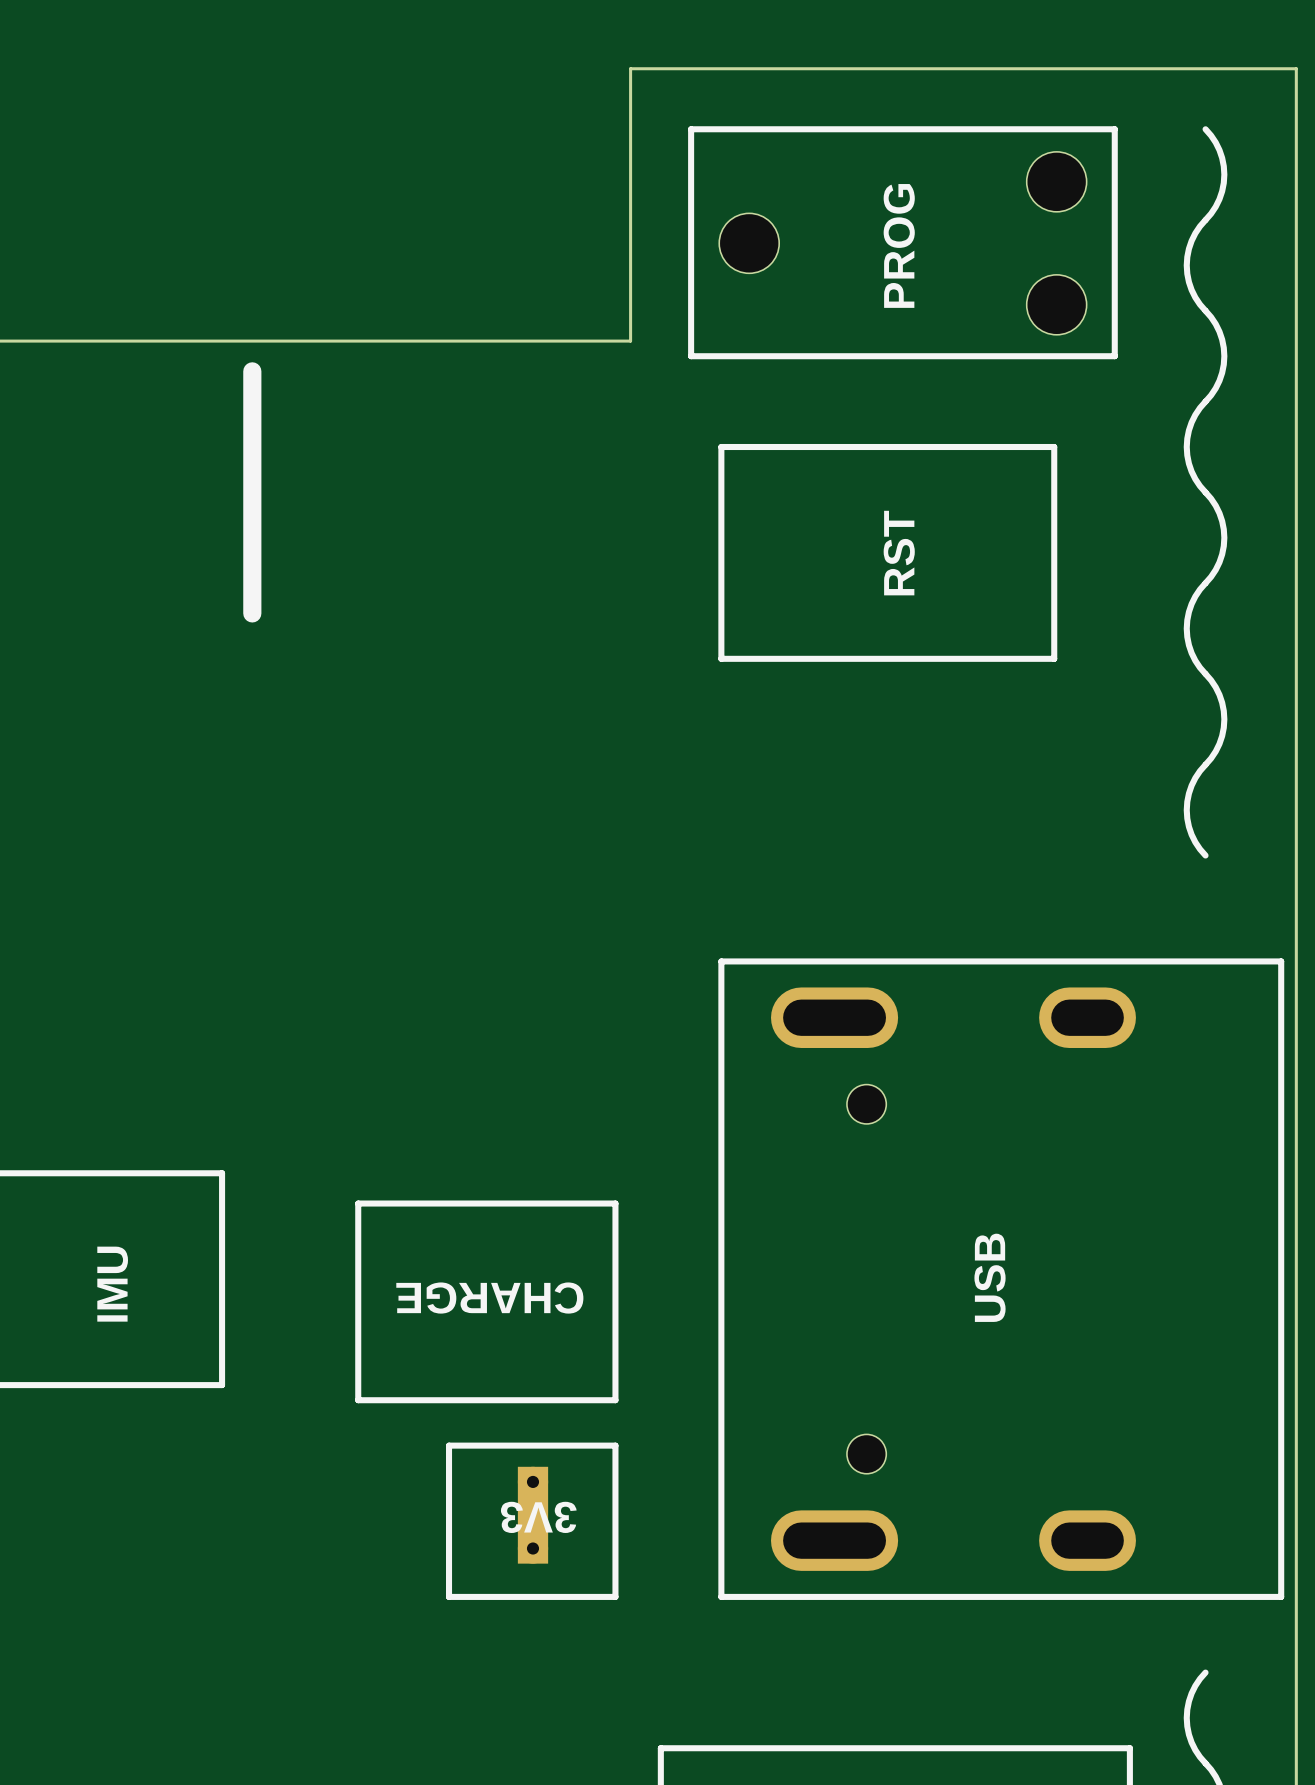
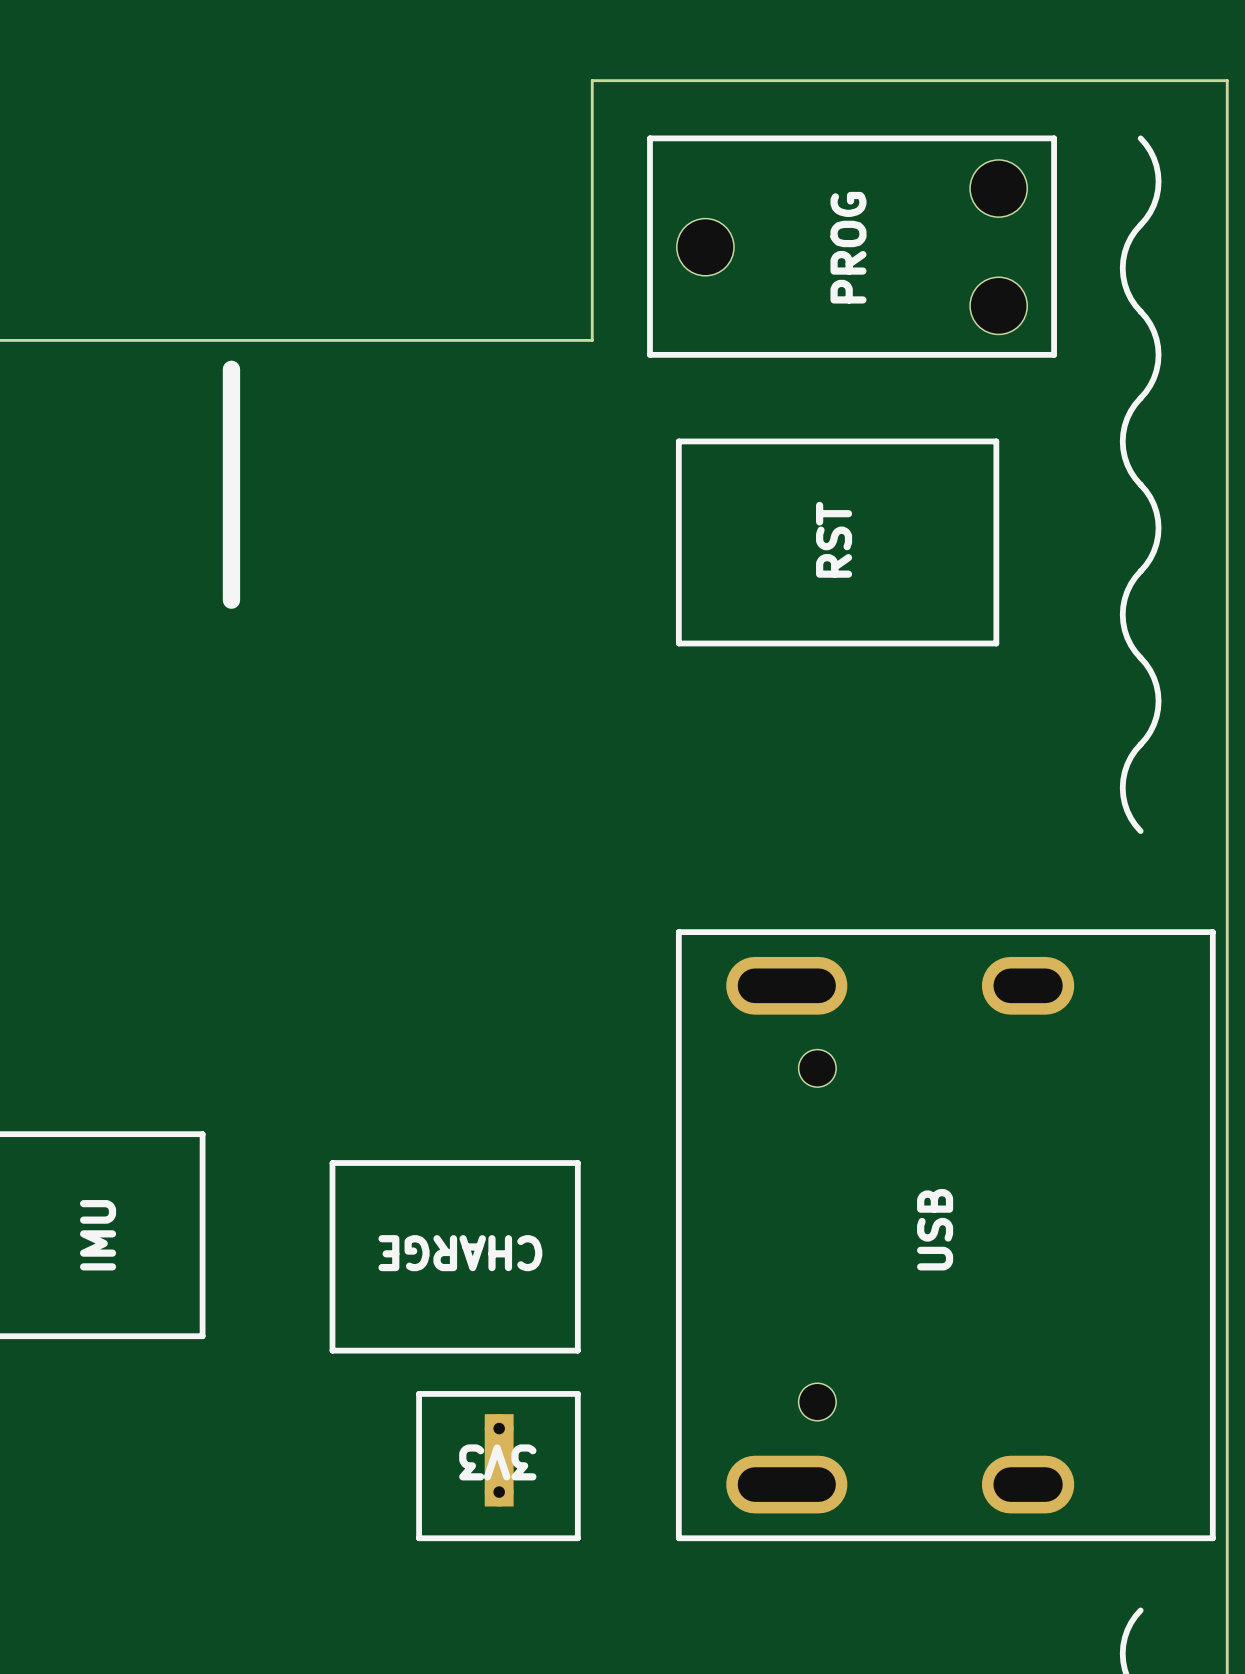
text position: RST (899, 553) -> RST (834, 539)

